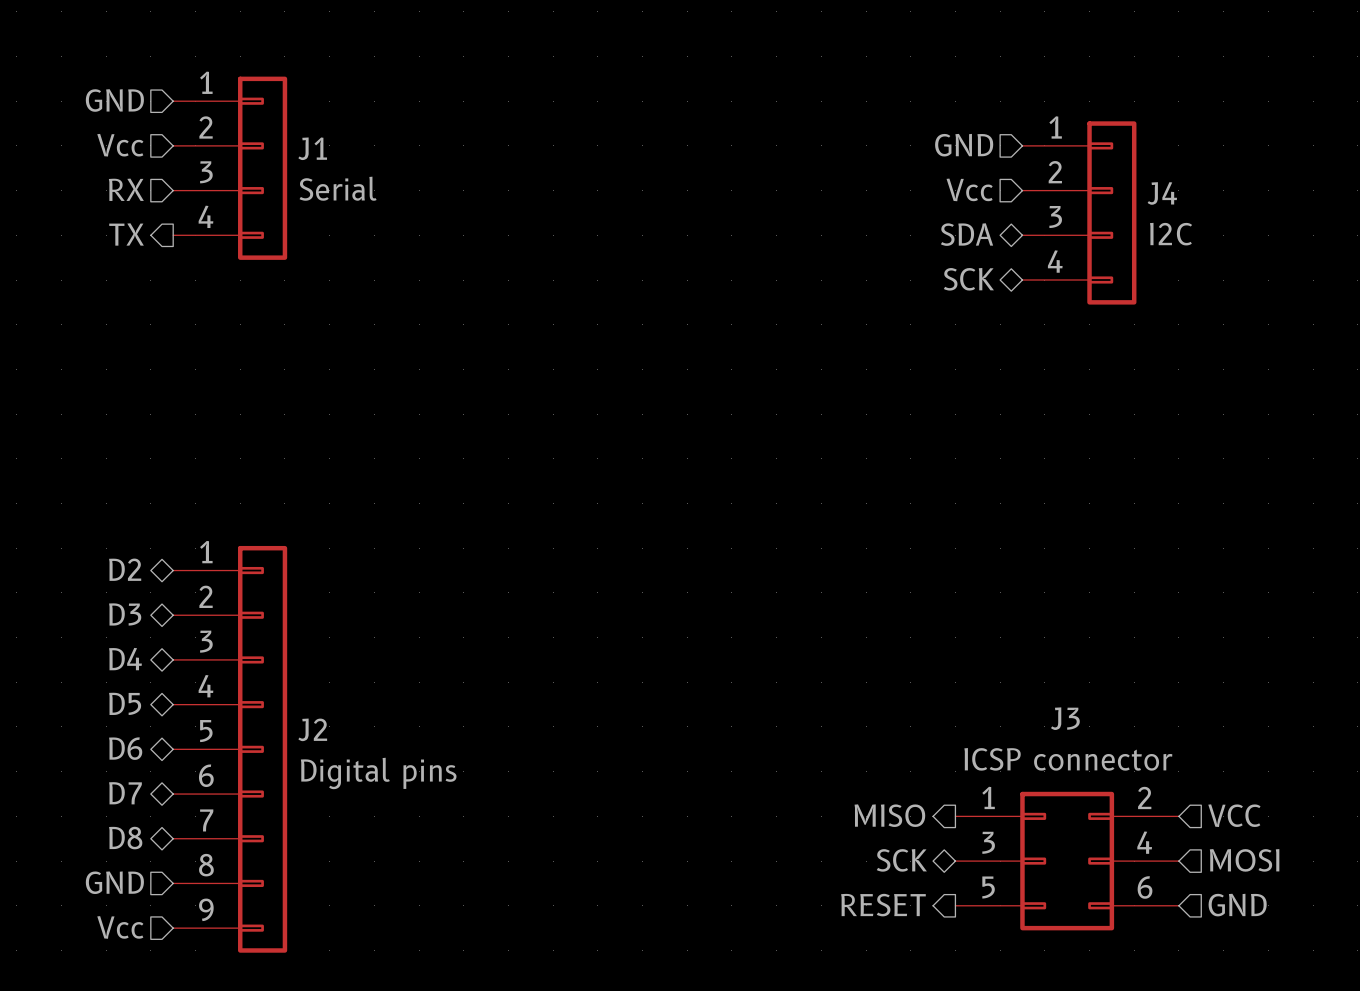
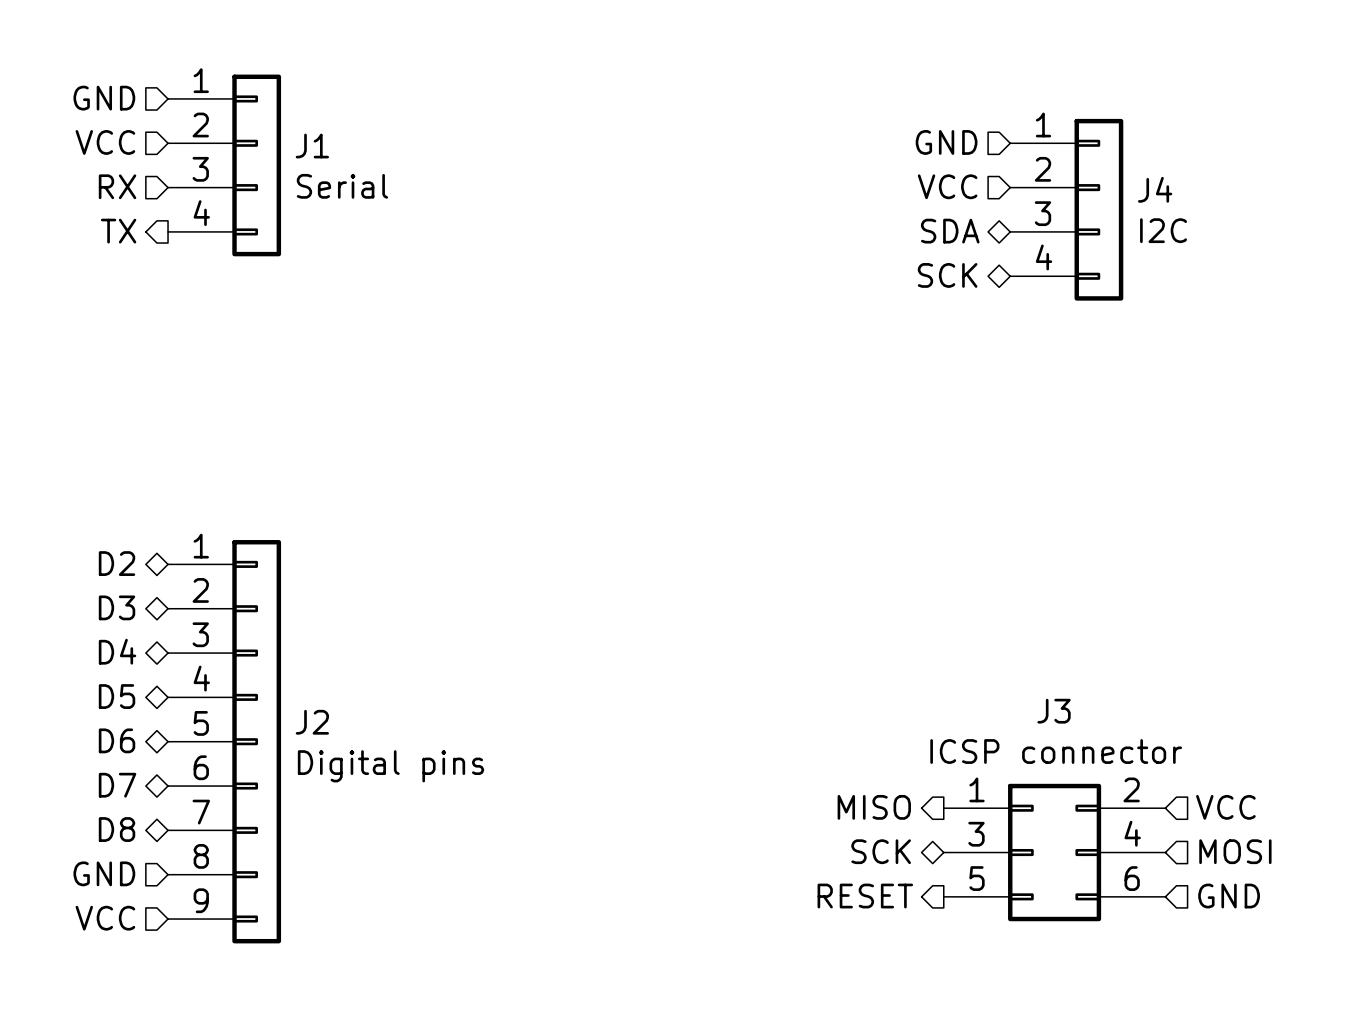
hierarchical label: Vcc (120, 145) -> VCC (105, 142)
hierarchical label: Vcc (969, 189) -> VCC (947, 186)
hierarchical label: Vcc (120, 927) -> VCC (105, 918)

